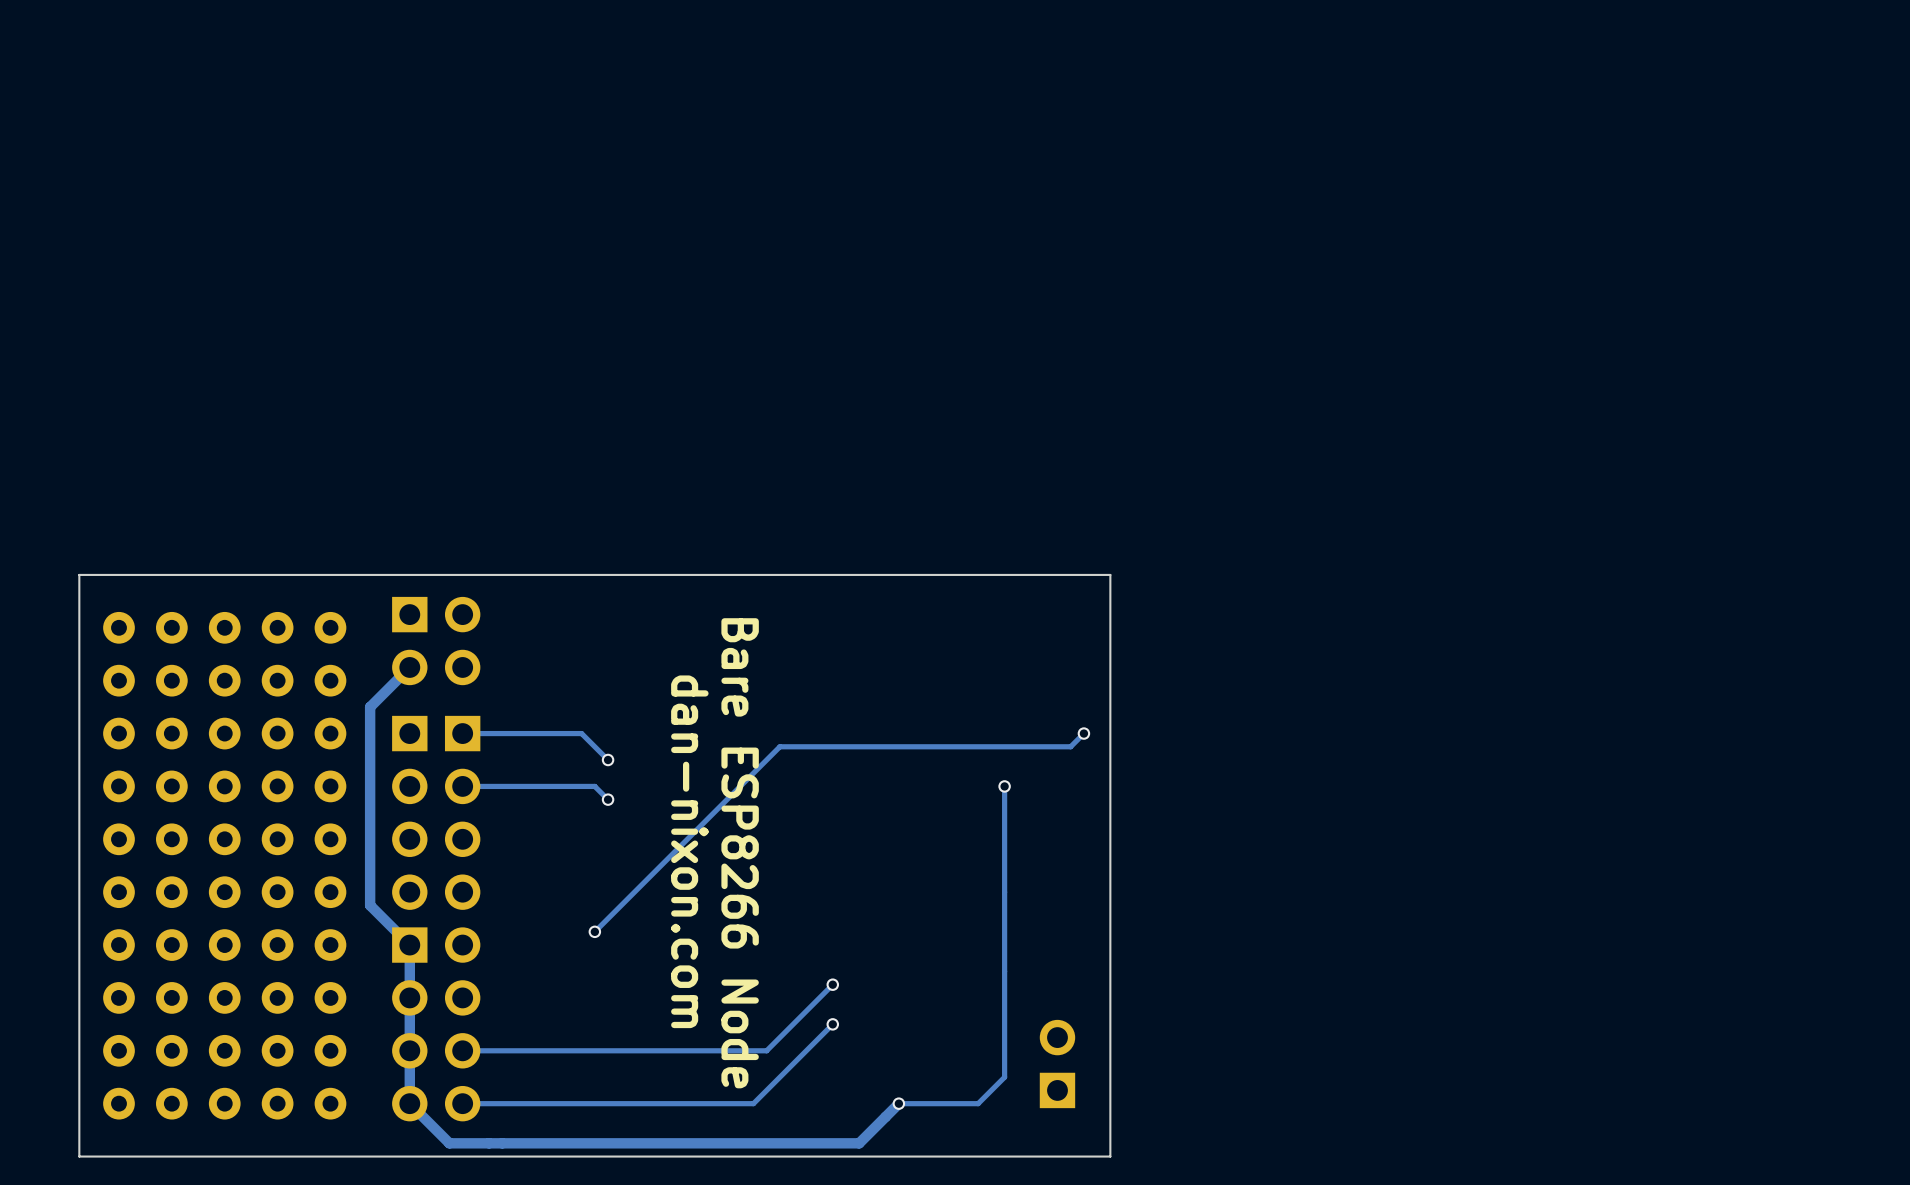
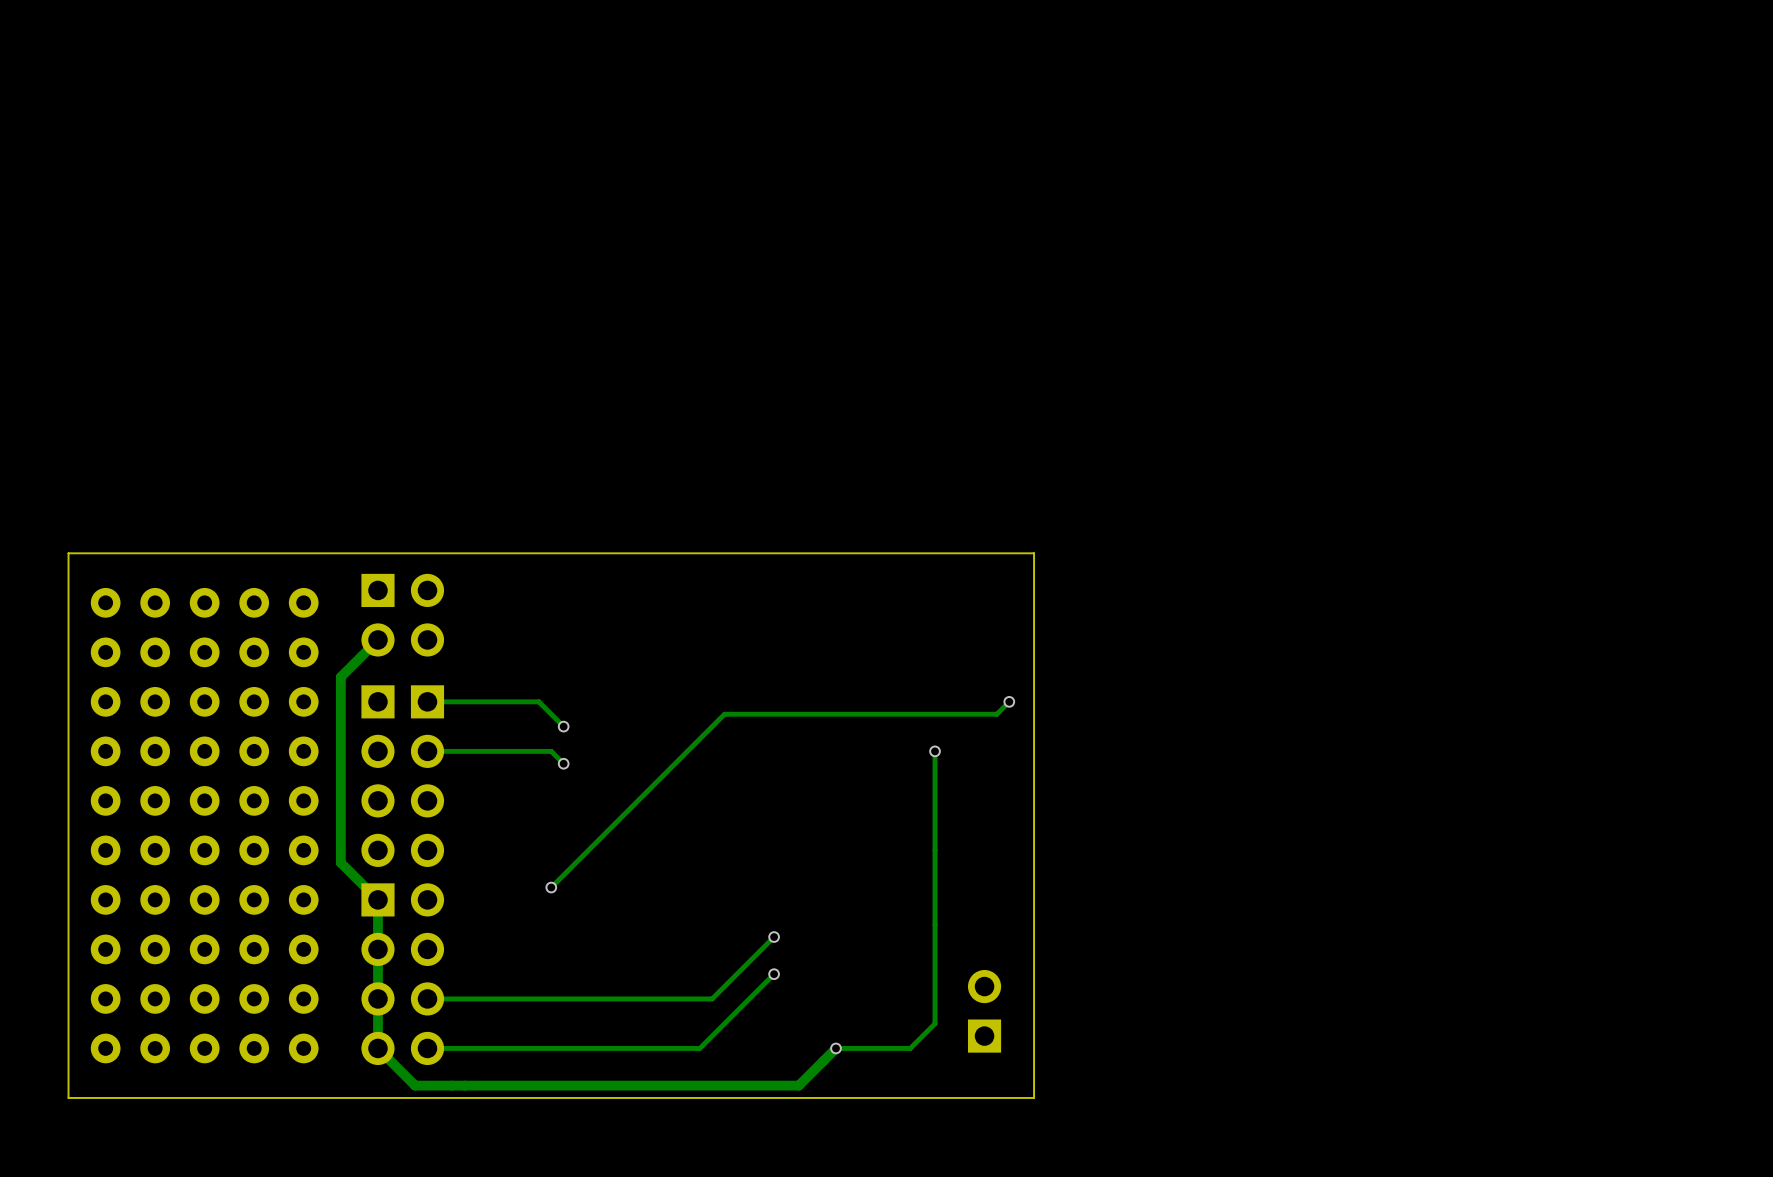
text: dan-nixon.com (689, 851) -> none
text: Bare ESP8266 Node (740, 853) -> none

